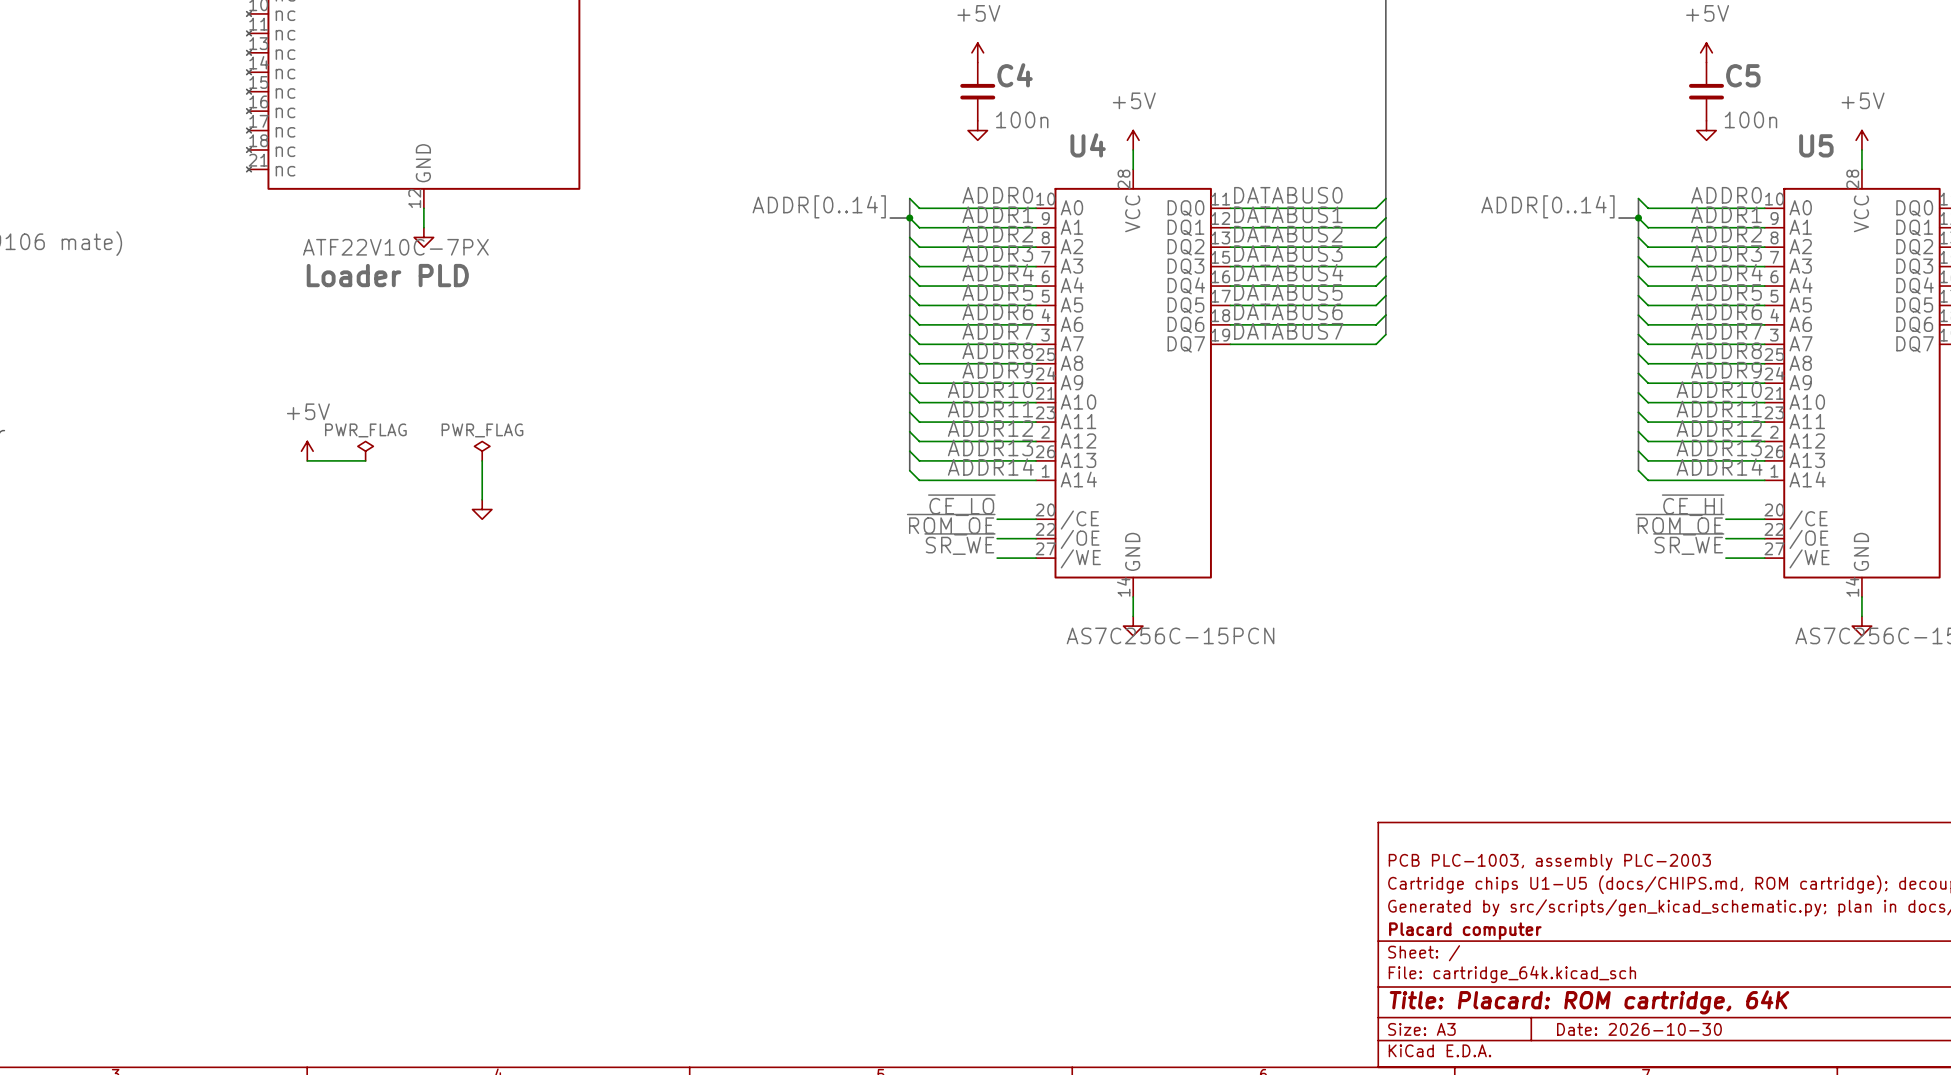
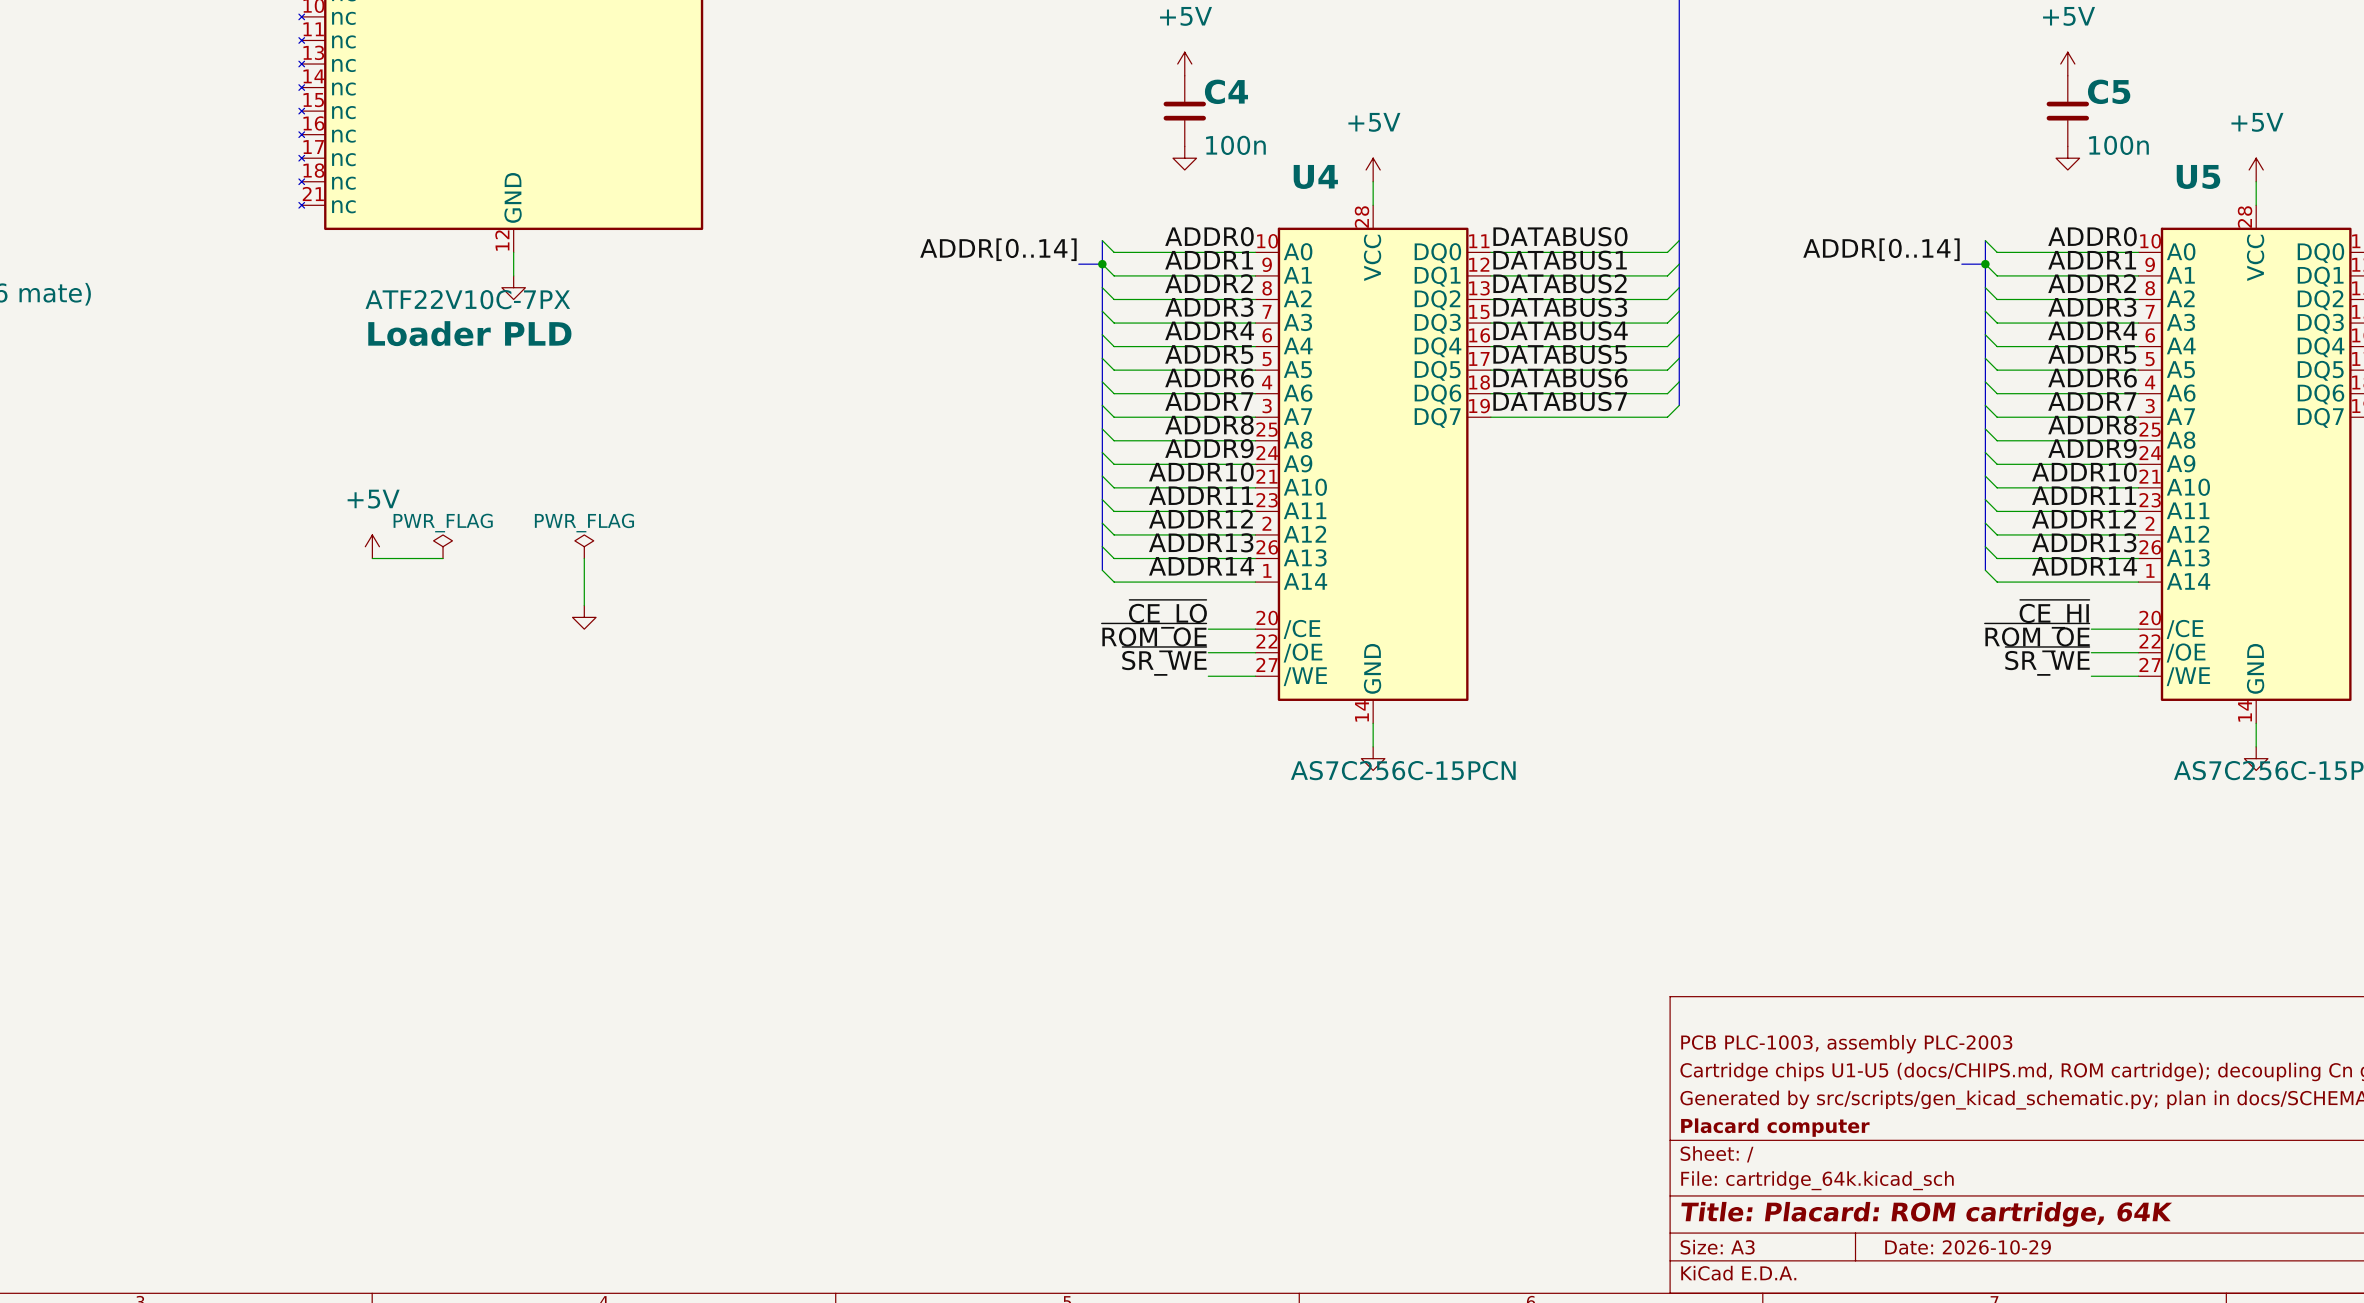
title block: Date: 2026-10-30 (1639, 1029) -> Date: 2026-10-29 (1968, 1247)

